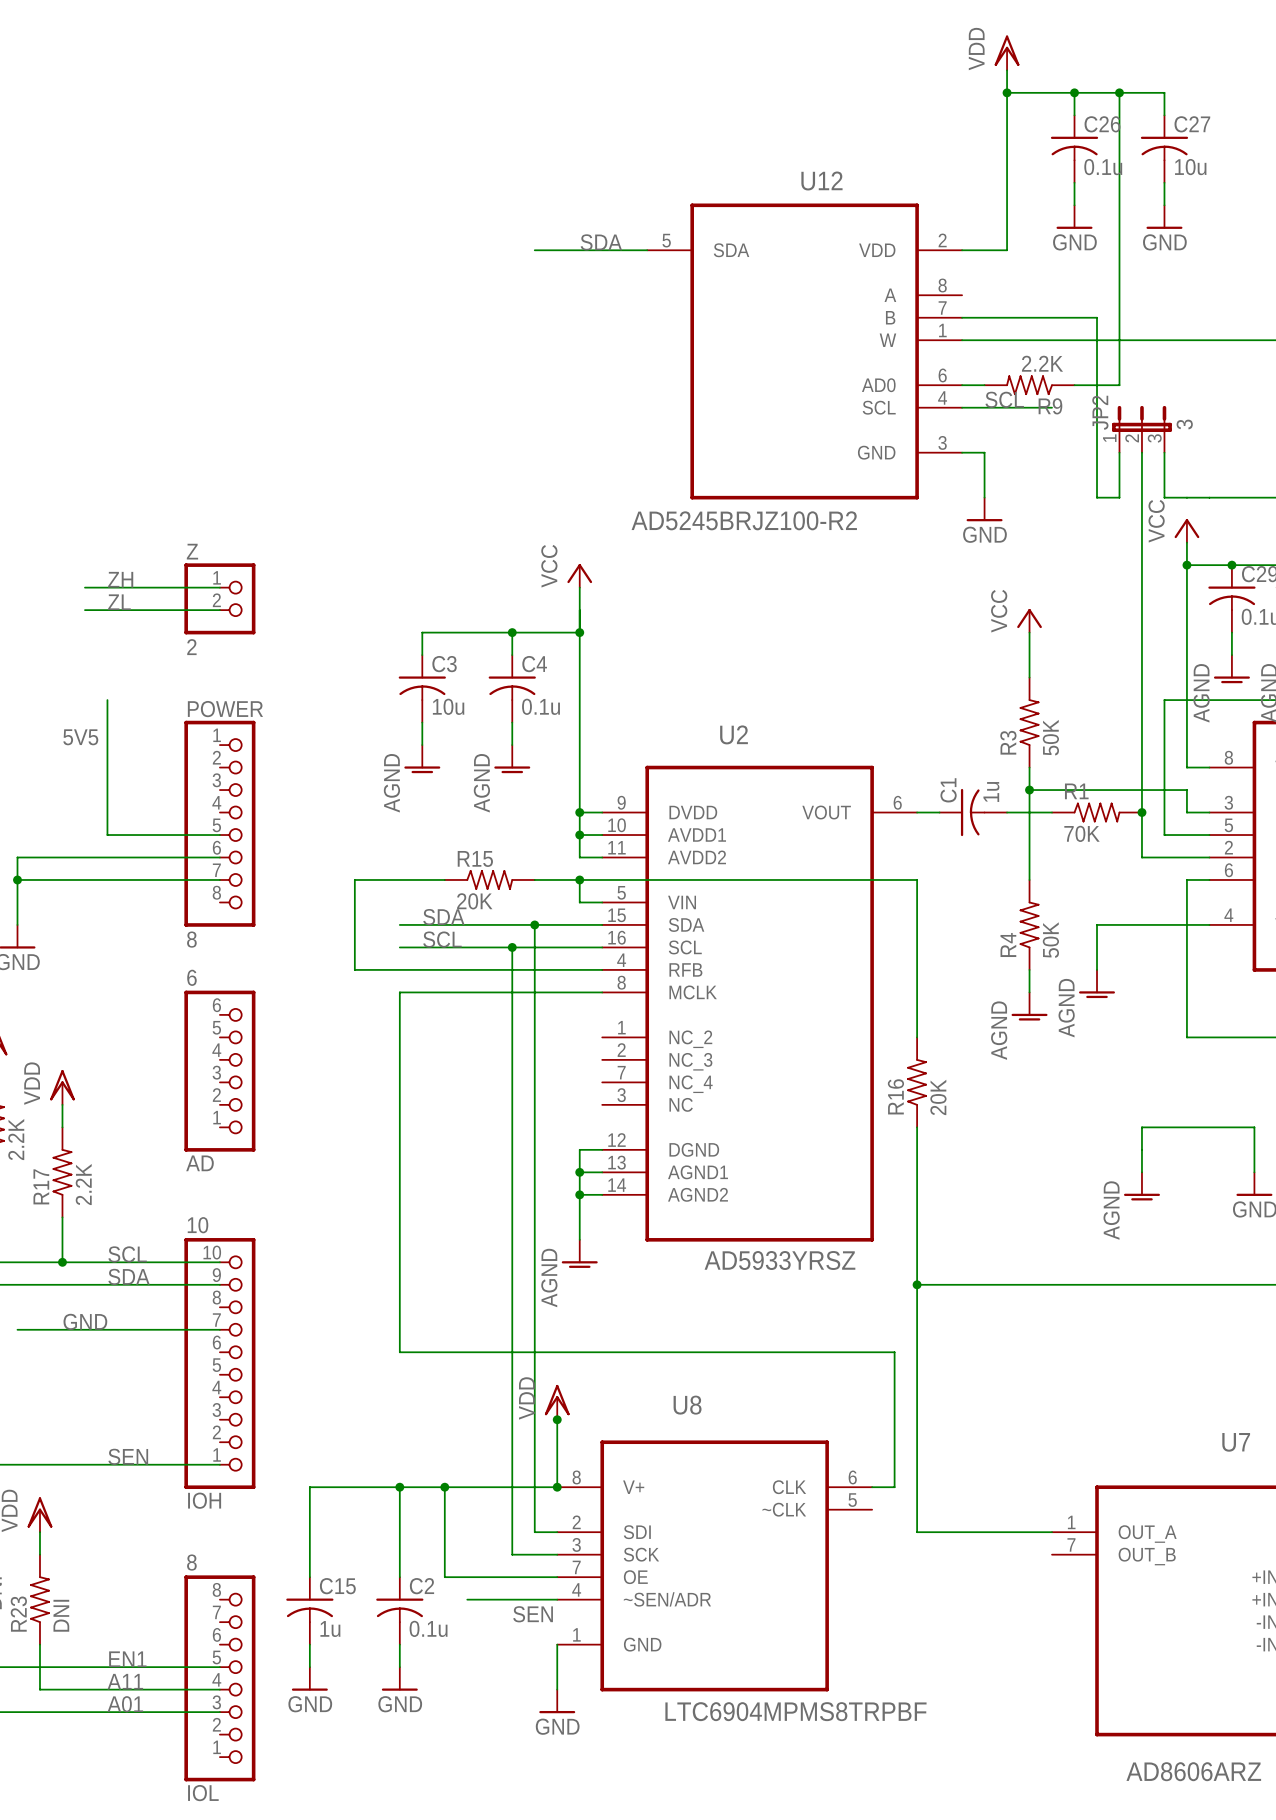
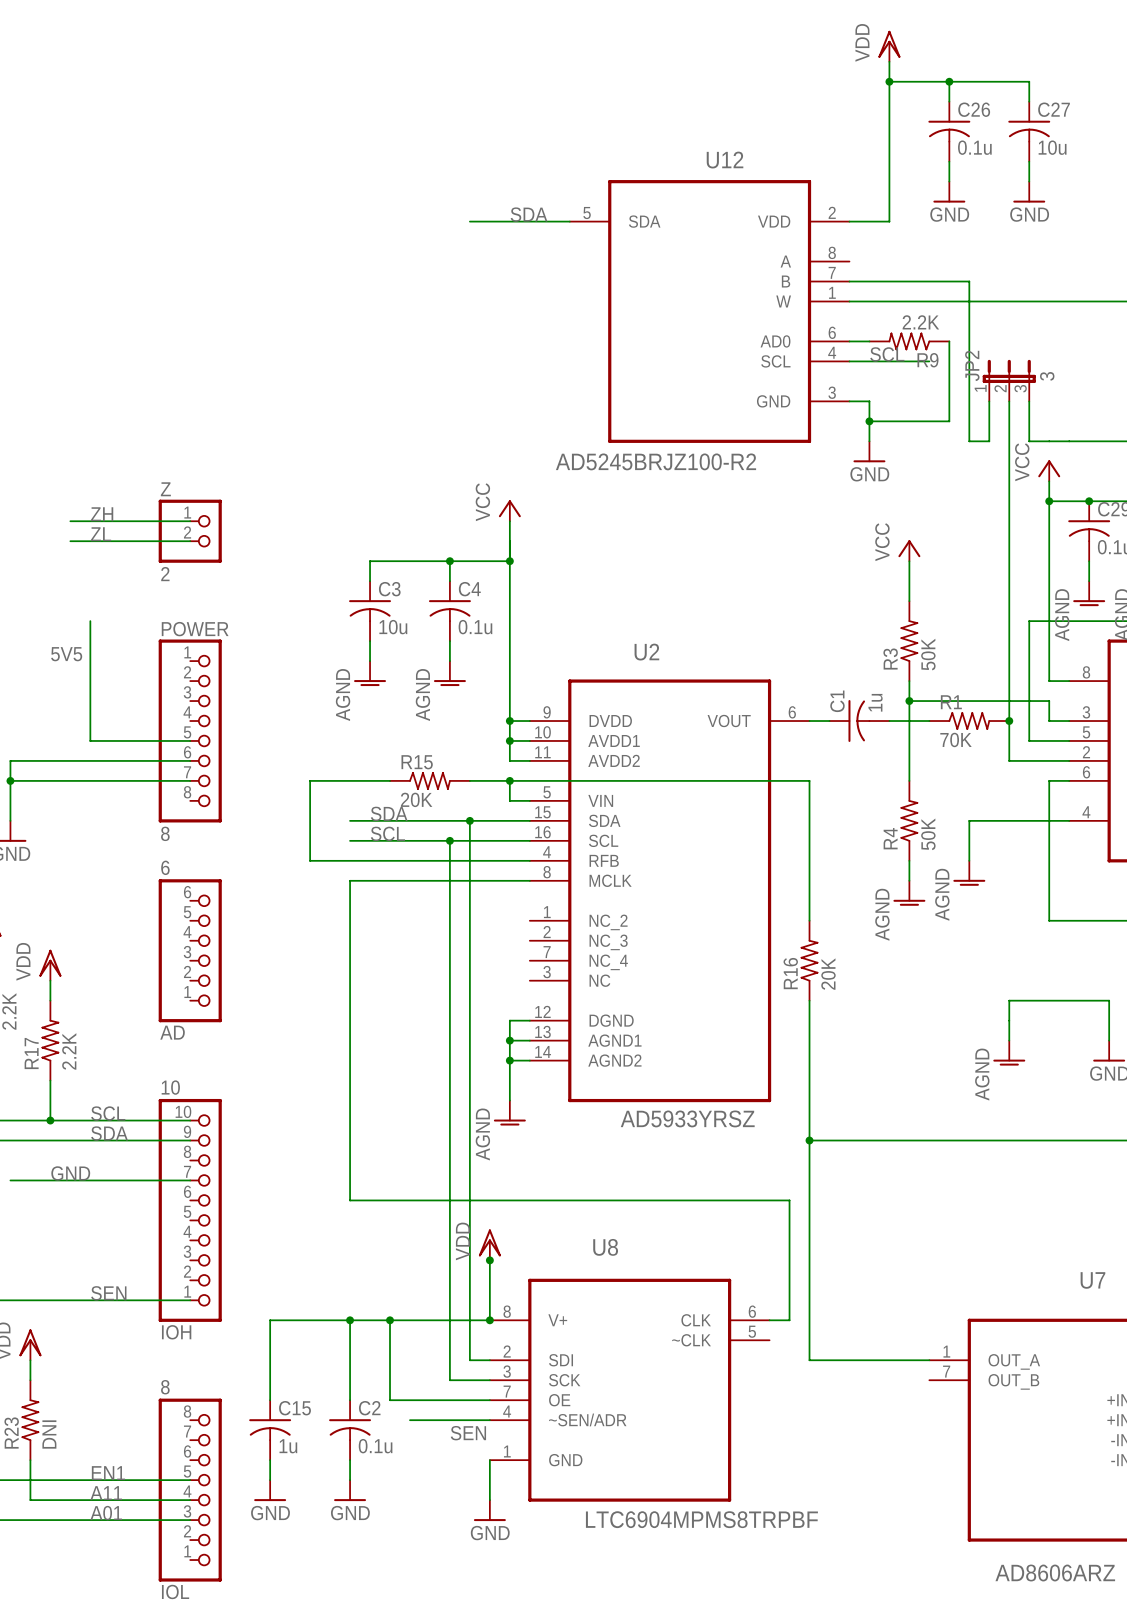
wire: (1119, 92) (1119, 385) (1074, 385) -> (869, 421) (949, 421) (949, 341)
junction: (1119, 92) -> none
junction: none -> (869, 421)

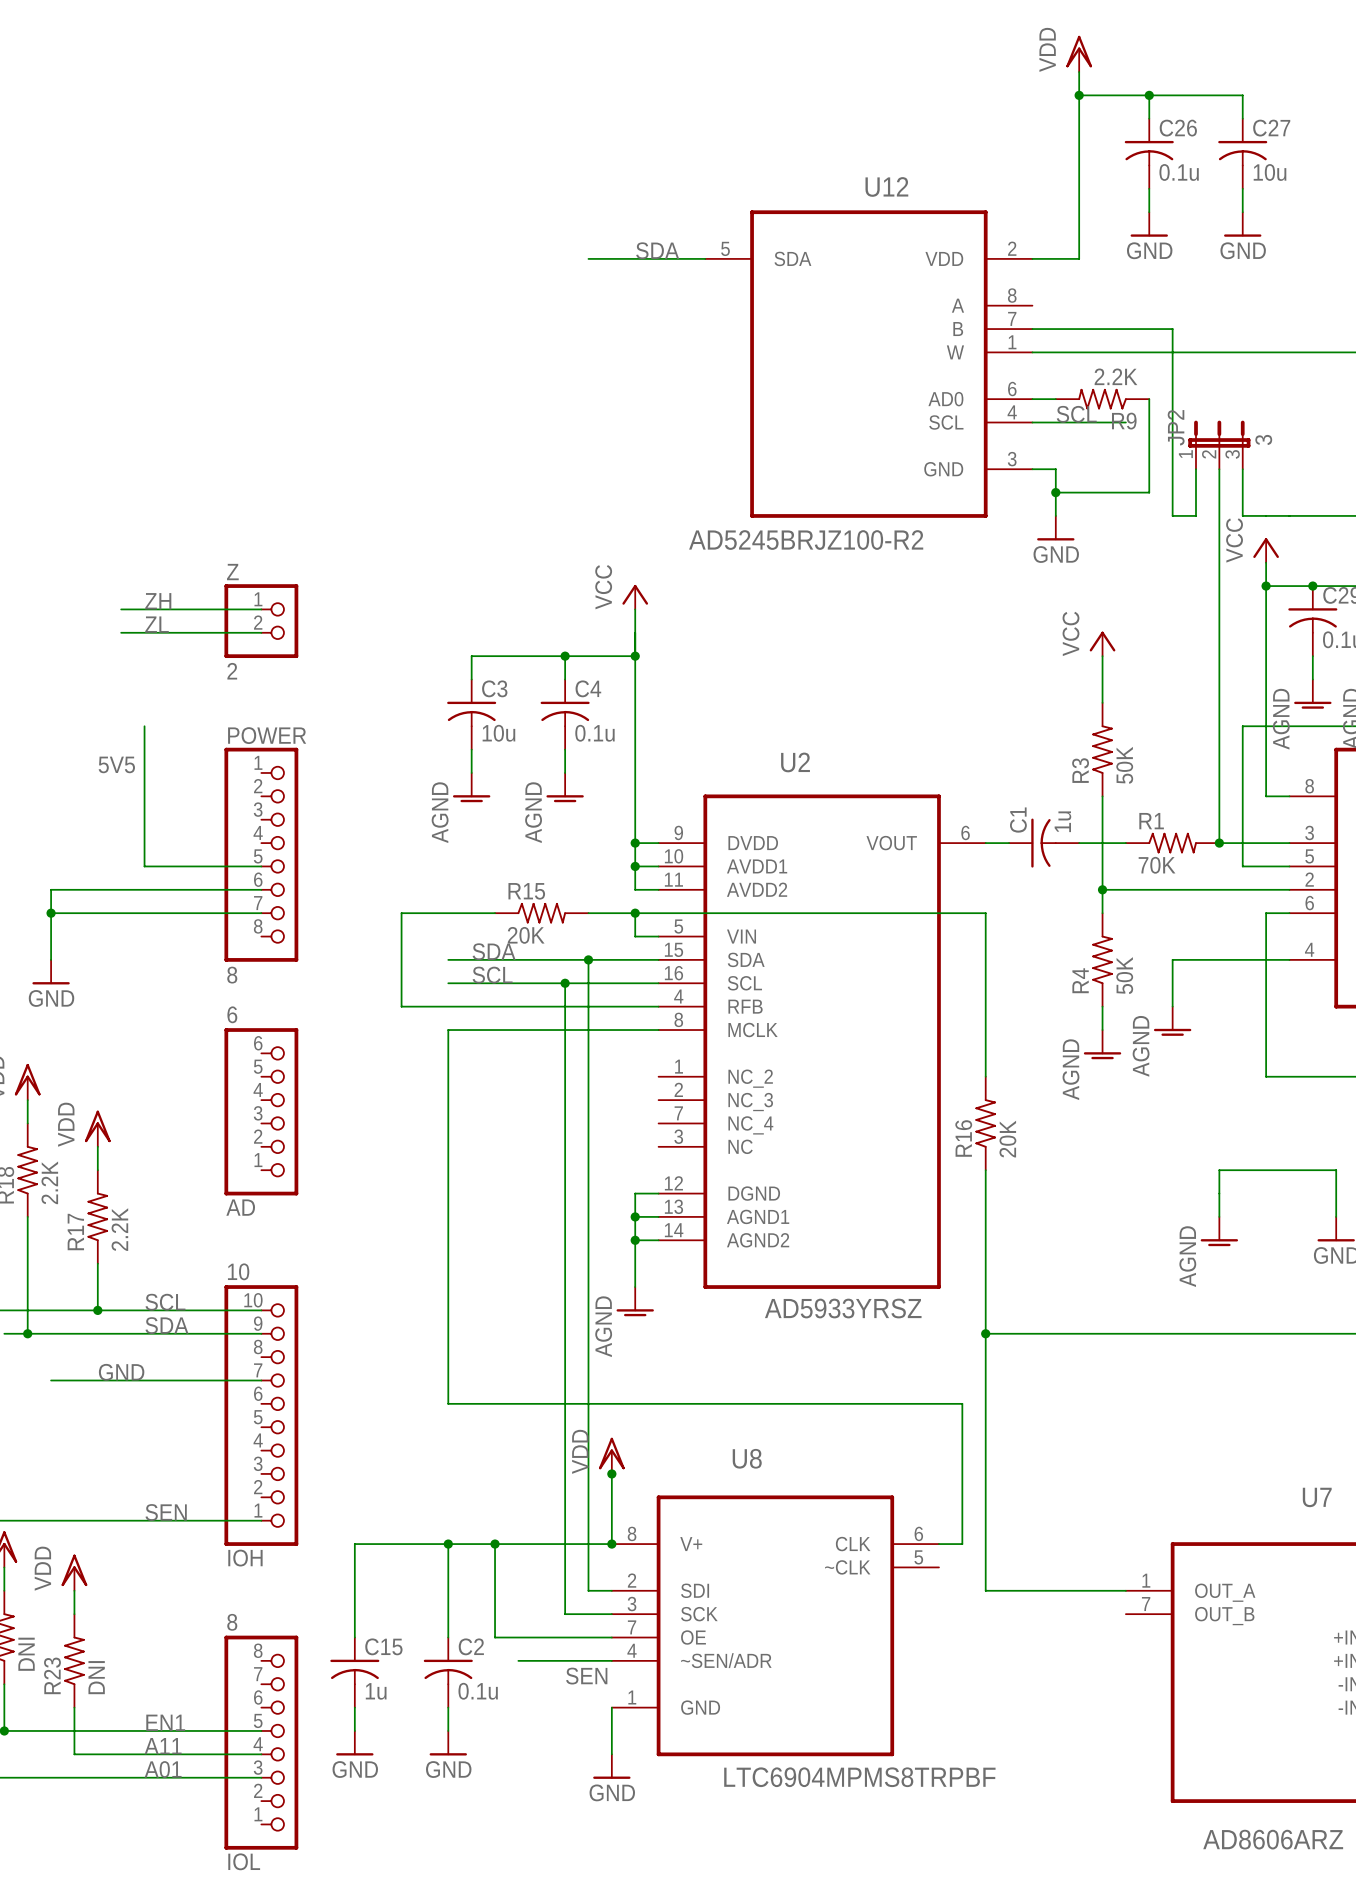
wire: (909, 701) (1049, 701) (1049, 721) -> none
junction: (909, 701) -> none
wire: (1009, 721) (1009, 760) -> (1219, 843) (1266, 843)
wire: none -> (1102, 889) (1219, 889)
junction: none -> (1102, 889)

